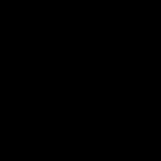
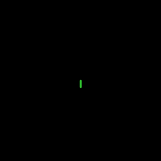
wire: none -> (80, 80) (80, 87)

